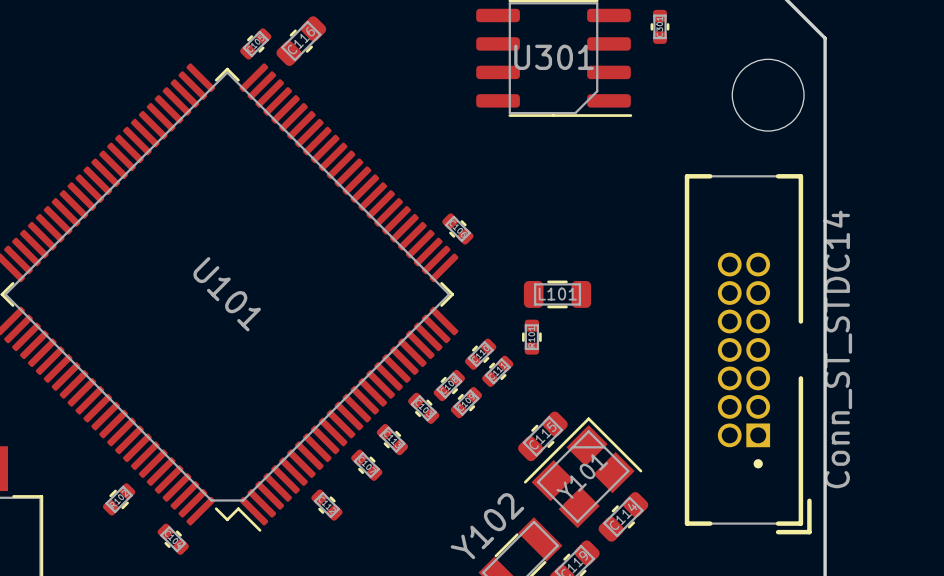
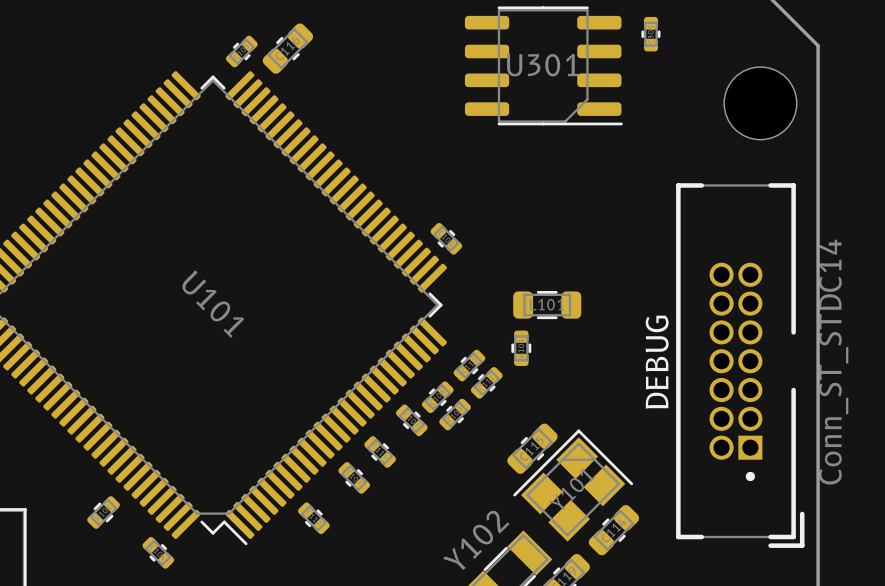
text: none -> DEBUG (657, 362)

